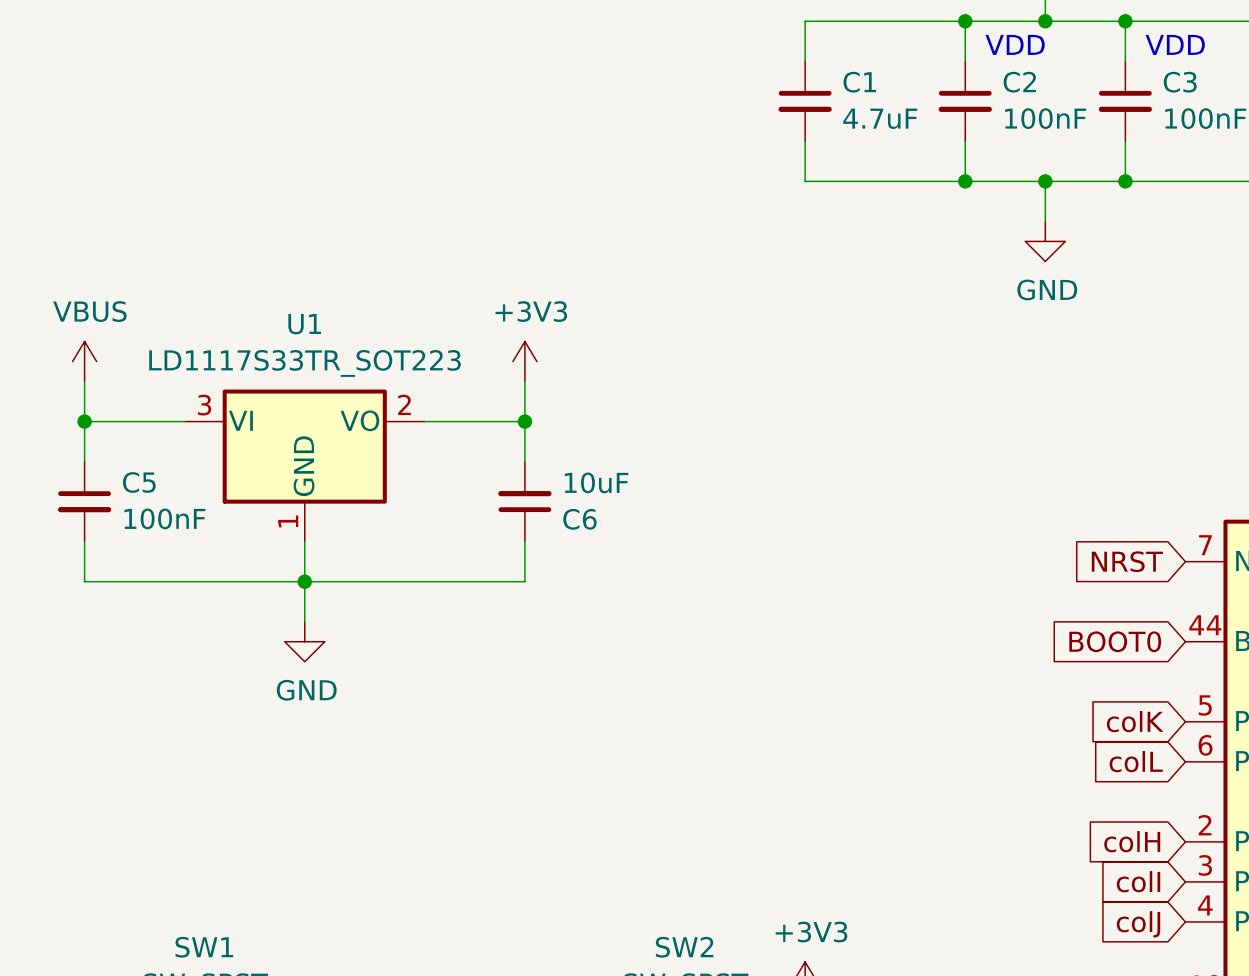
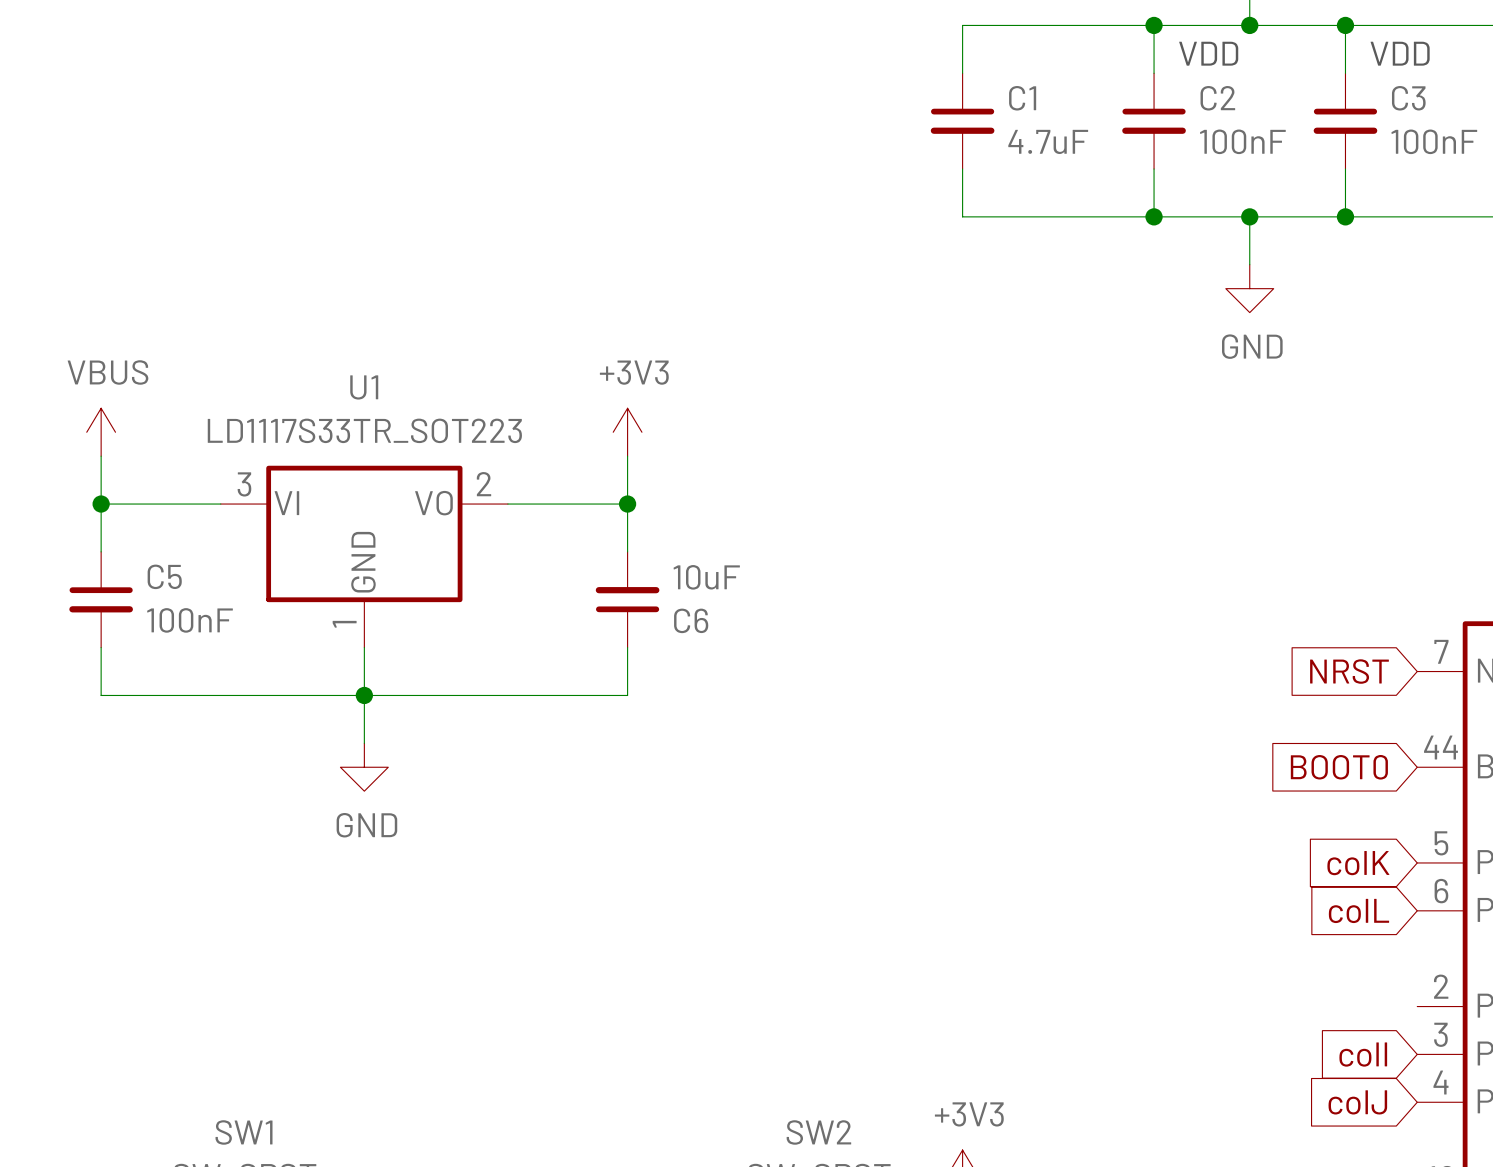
global label: colH (1132, 841) -> none

